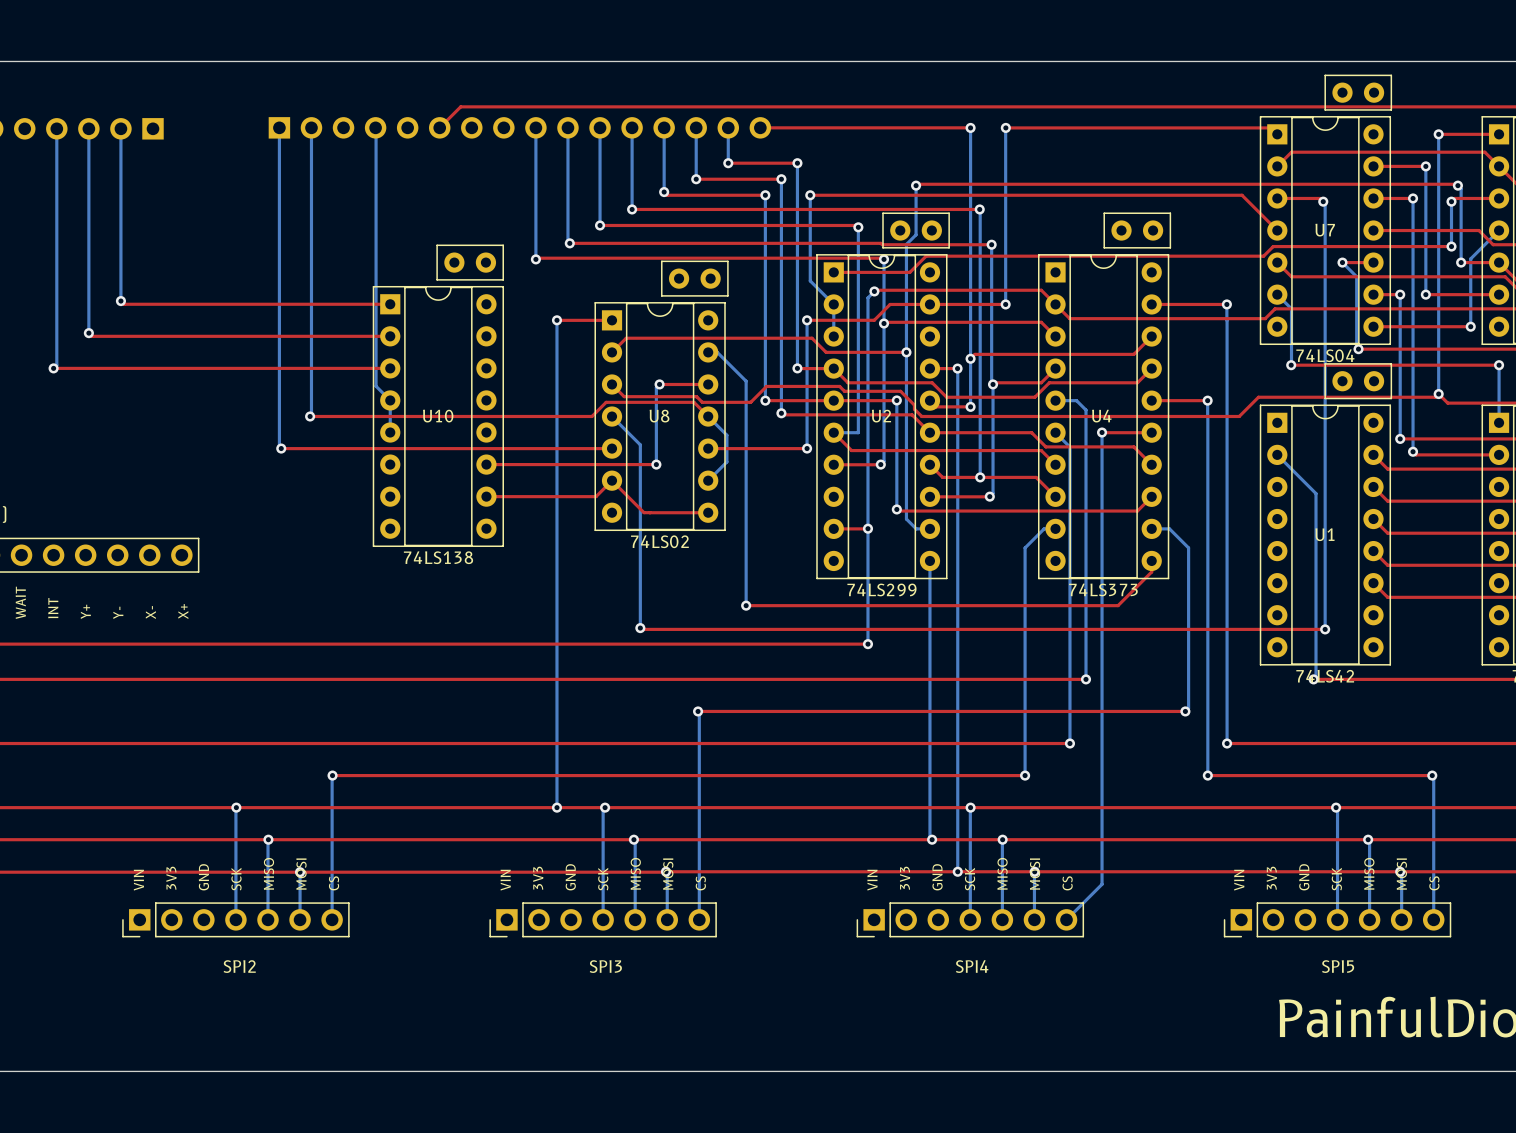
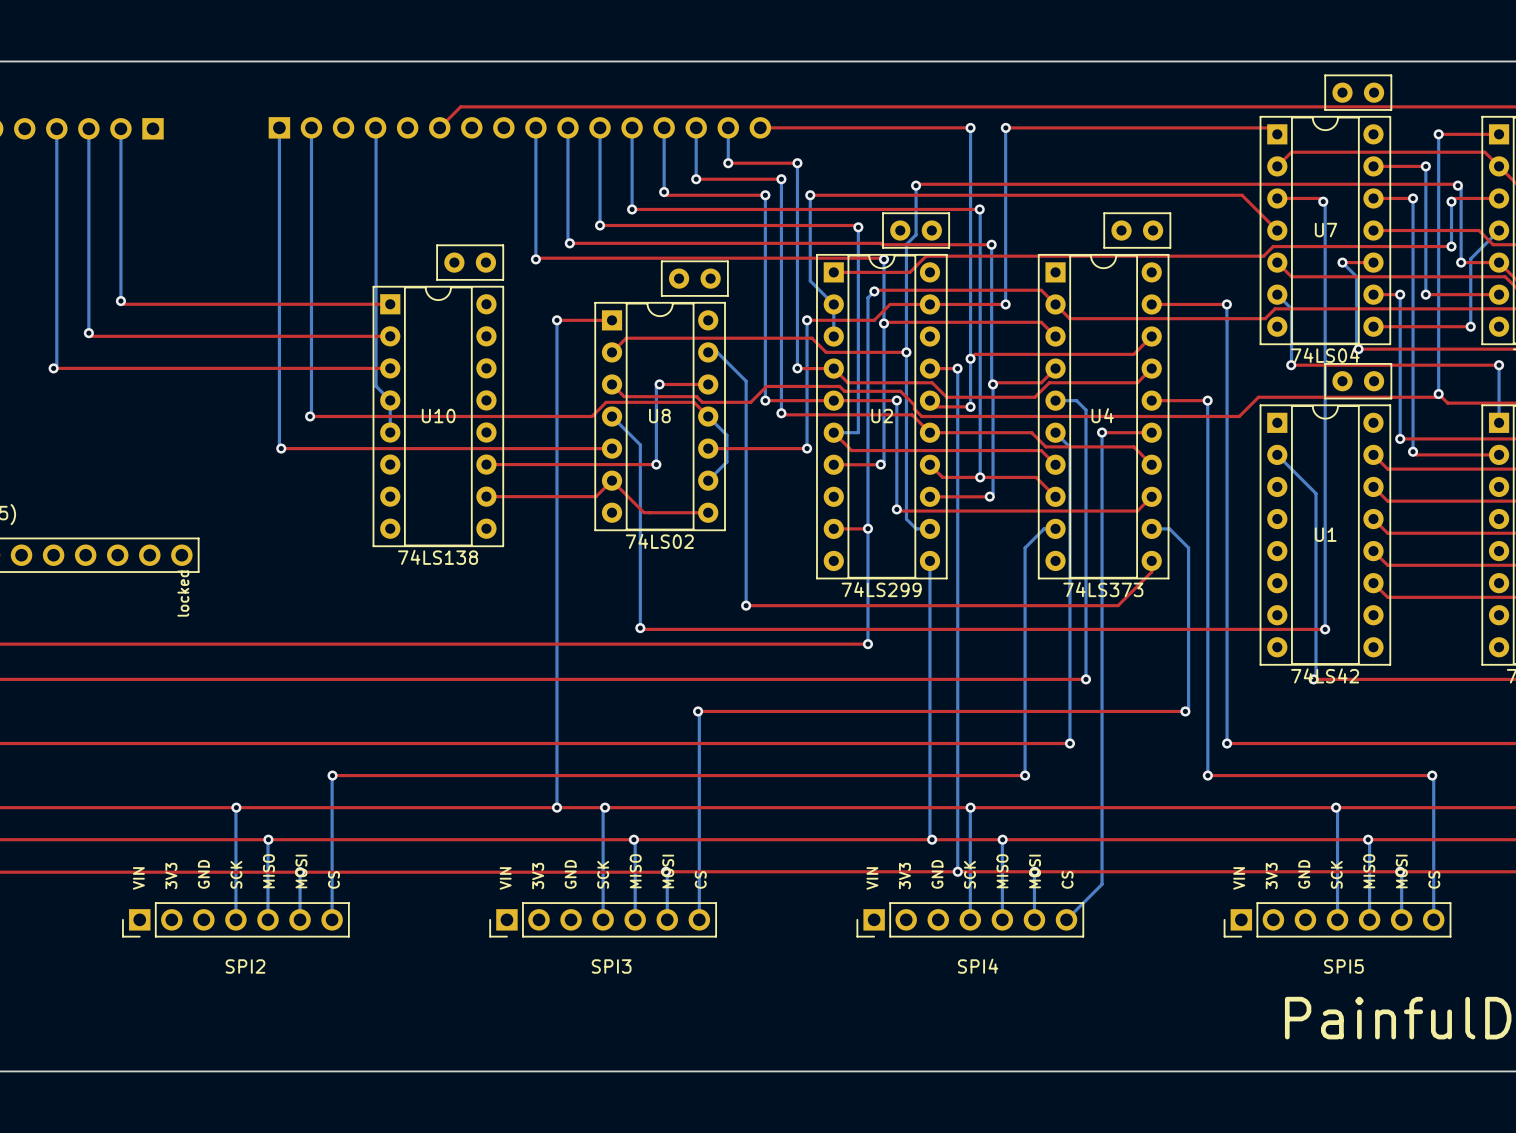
text: WAIT (20, 602) -> none
text: INT (53, 608) -> none
text: Y+ (85, 611) -> none
text: X+ (183, 611) -> locked (183, 593)
text: Y- (118, 612) -> none
text: X- (150, 612) -> none

